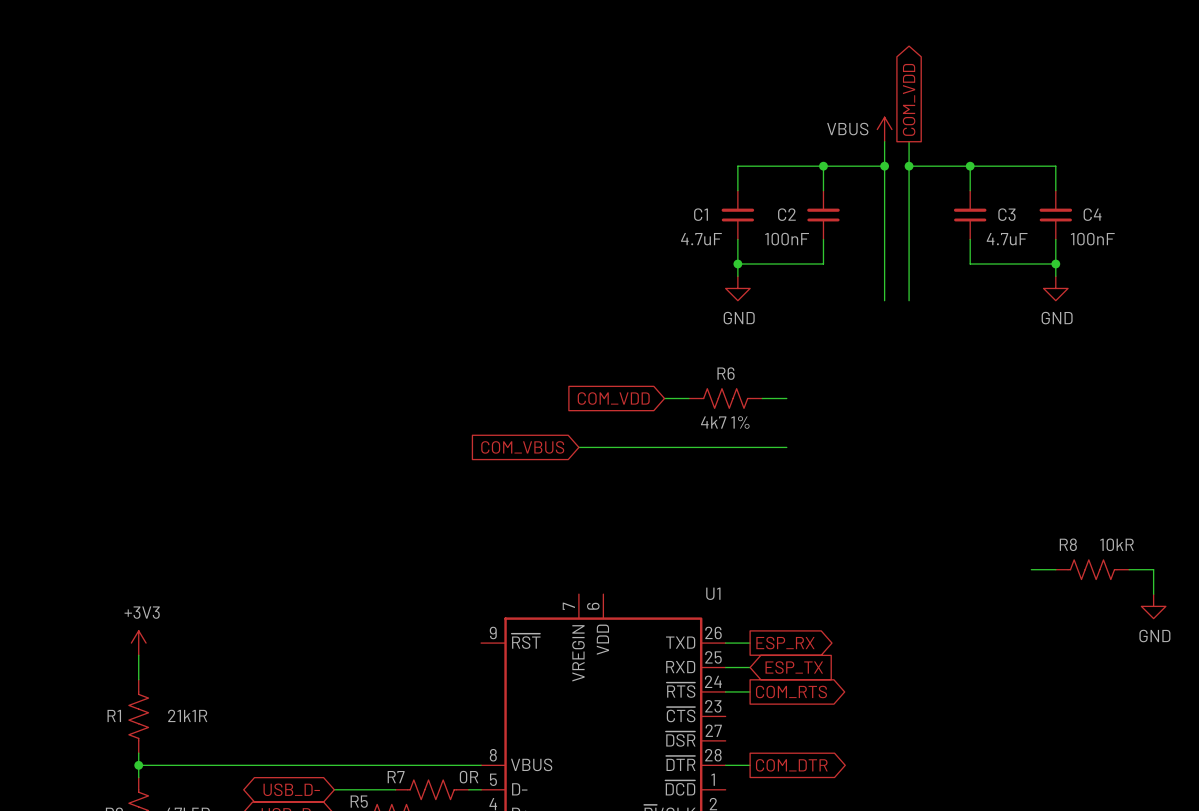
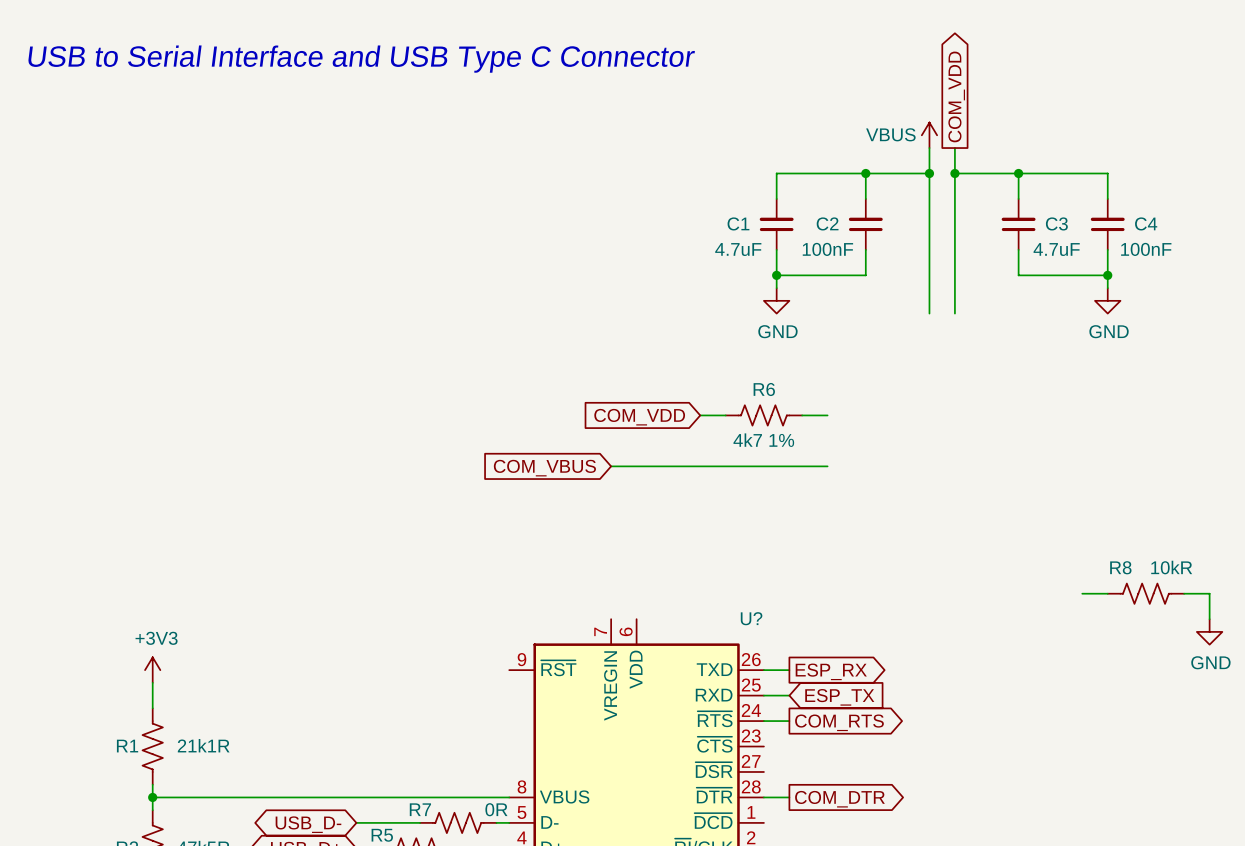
text: none -> USB to Serial Interface and USB Type C Connector (361, 59)
U1 name: U1 (713, 593) -> U? (751, 618)

